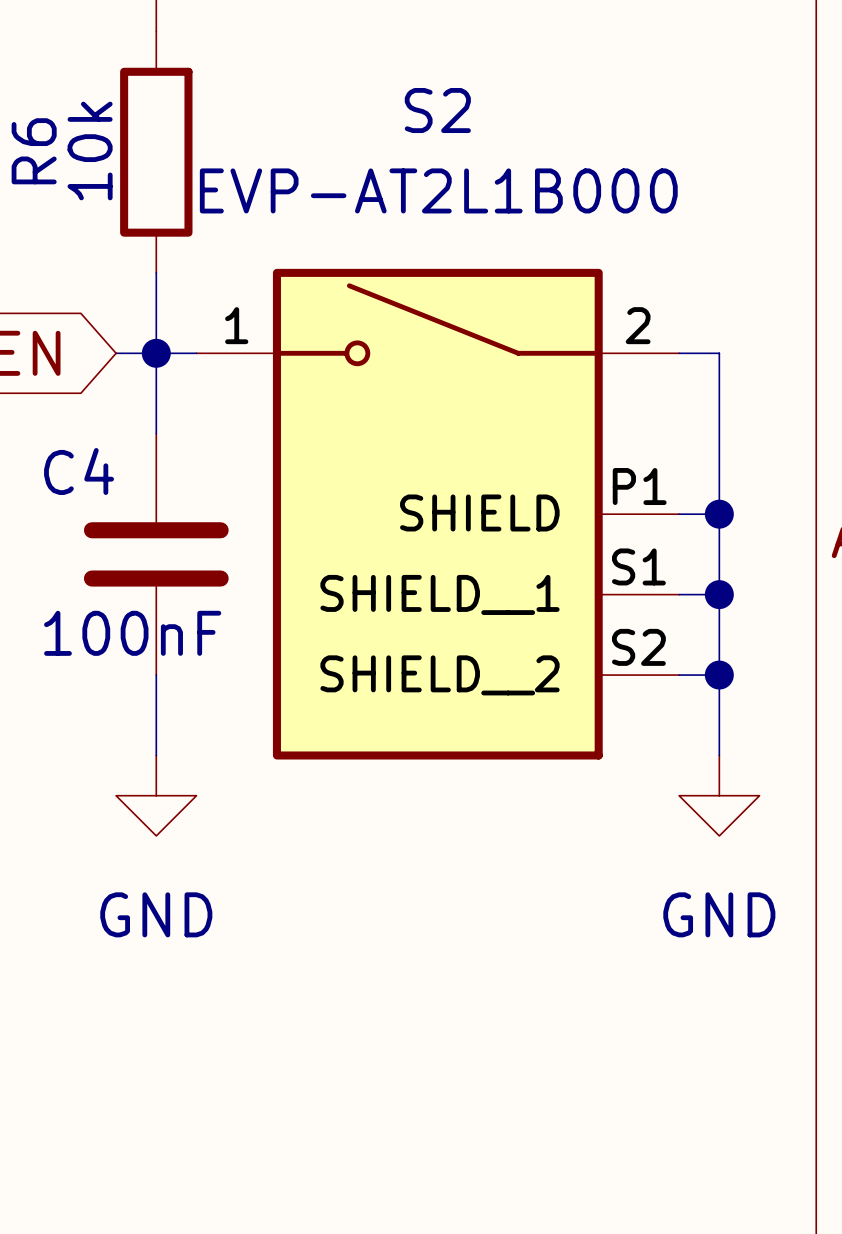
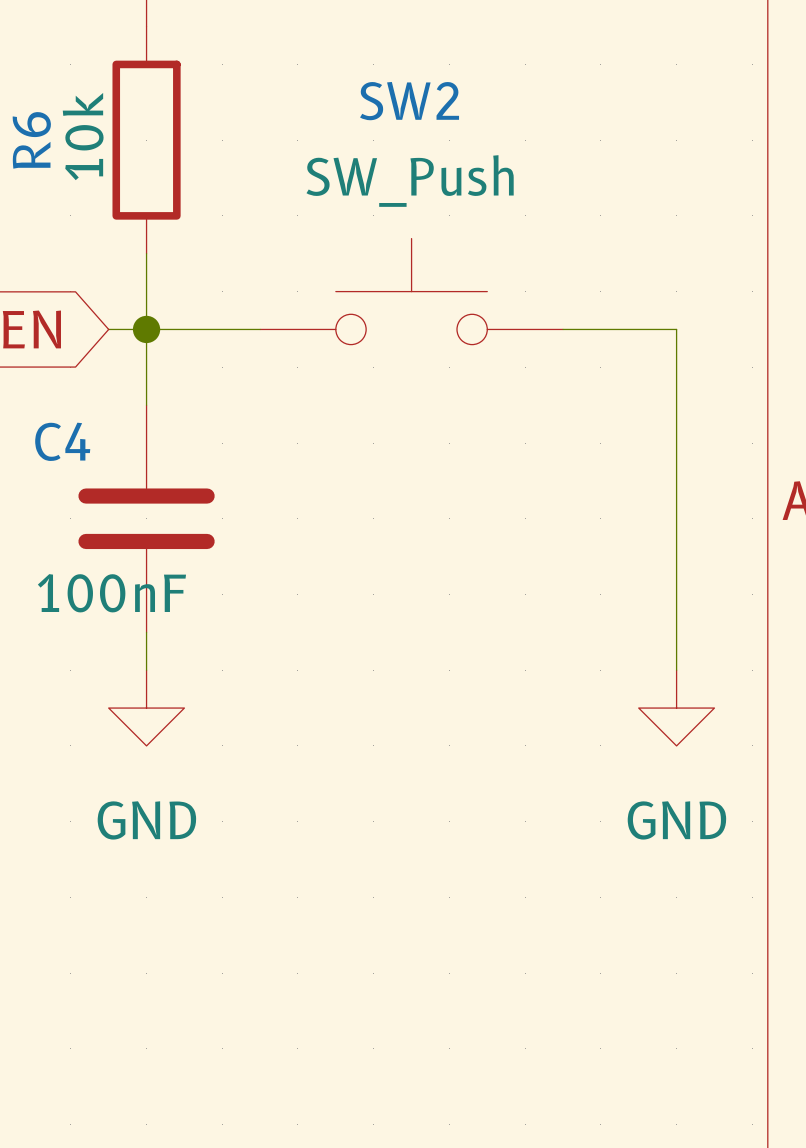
SW2: none -> SW_Push (411, 291)
S2: EVP-AT2L1B000 (437, 514) -> none
wire: (679, 514) (719, 514) -> none
junction: (719, 514) -> none
wire: (679, 594) (719, 594) -> none
junction: (719, 594) -> none
wire: (679, 675) (719, 675) -> none
junction: (719, 675) -> none
power symbol position: GND (156, 795) -> GND (146, 708)
power symbol position: GND (719, 795) -> GND (676, 708)

